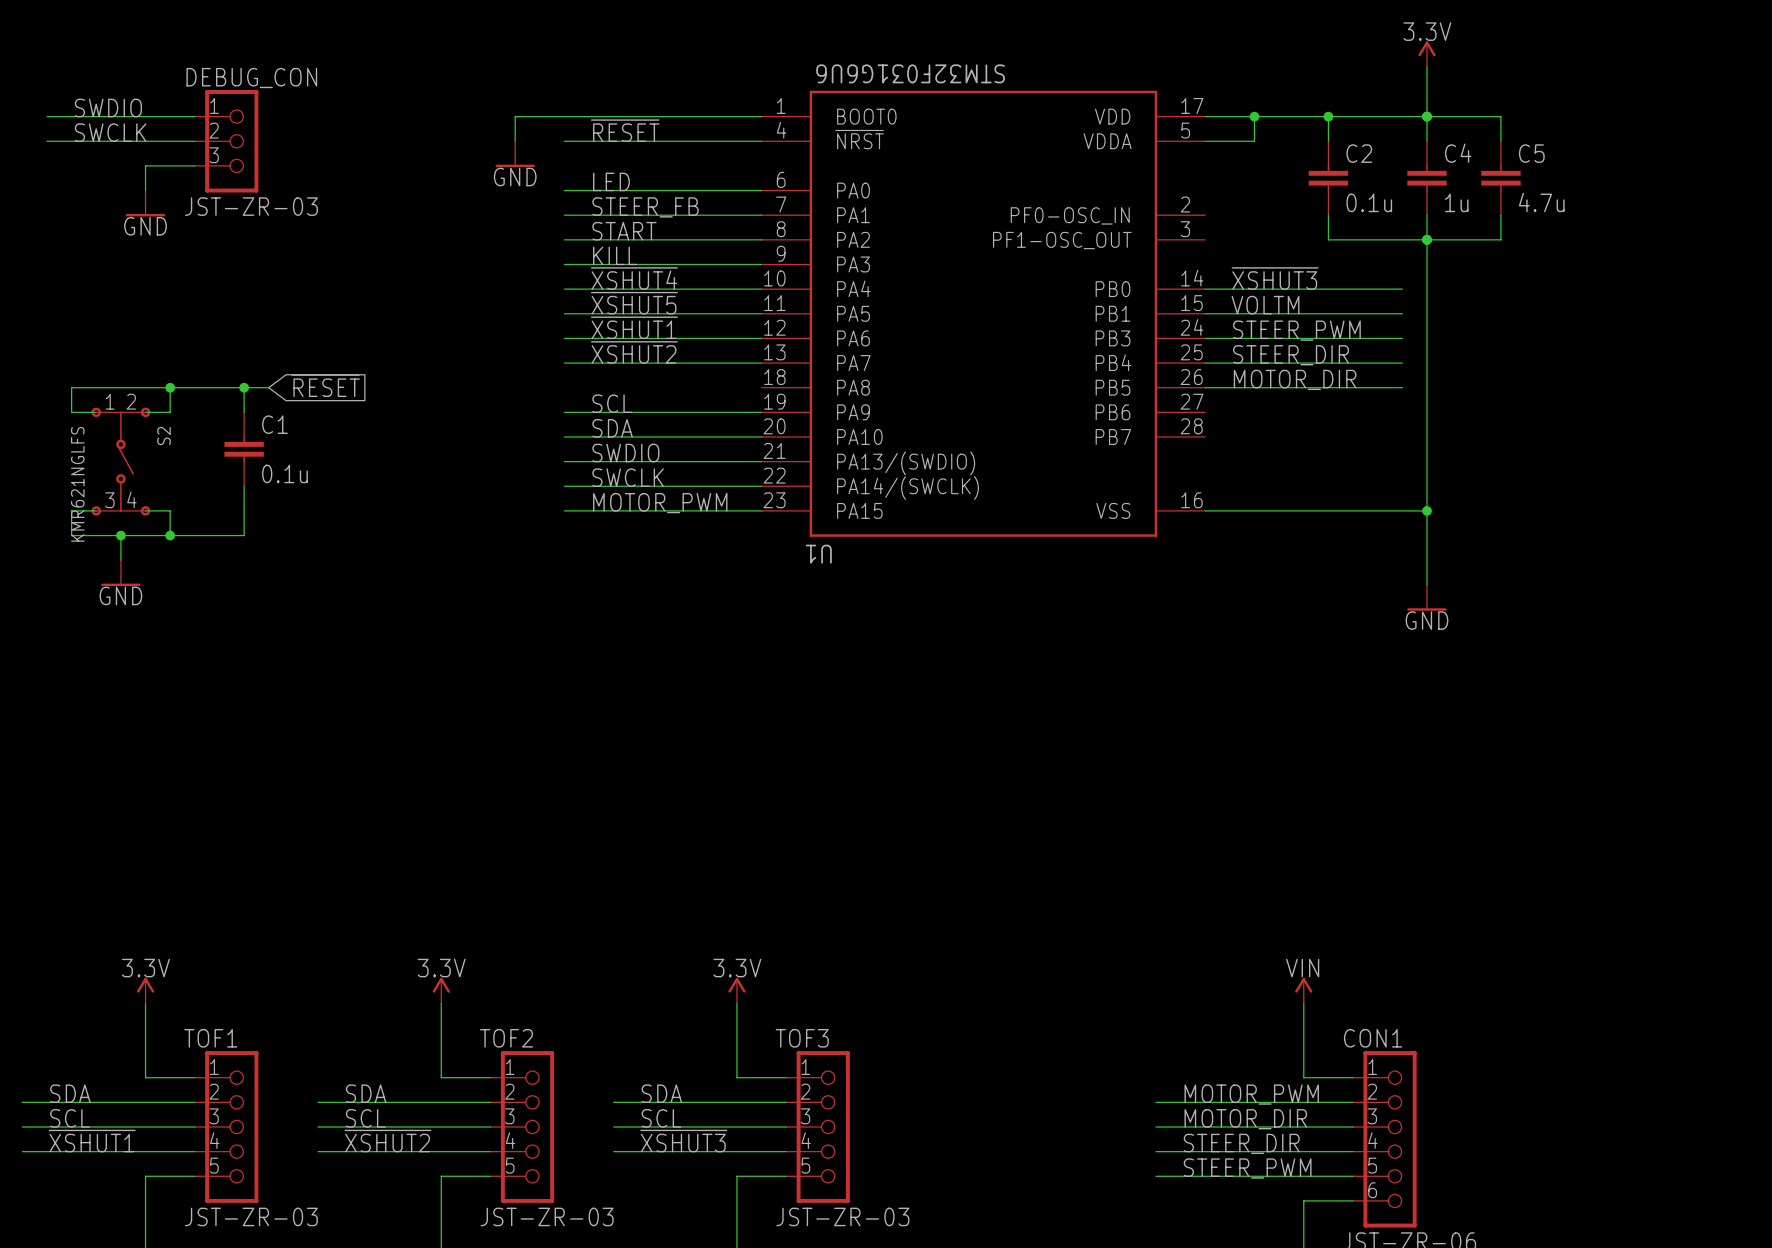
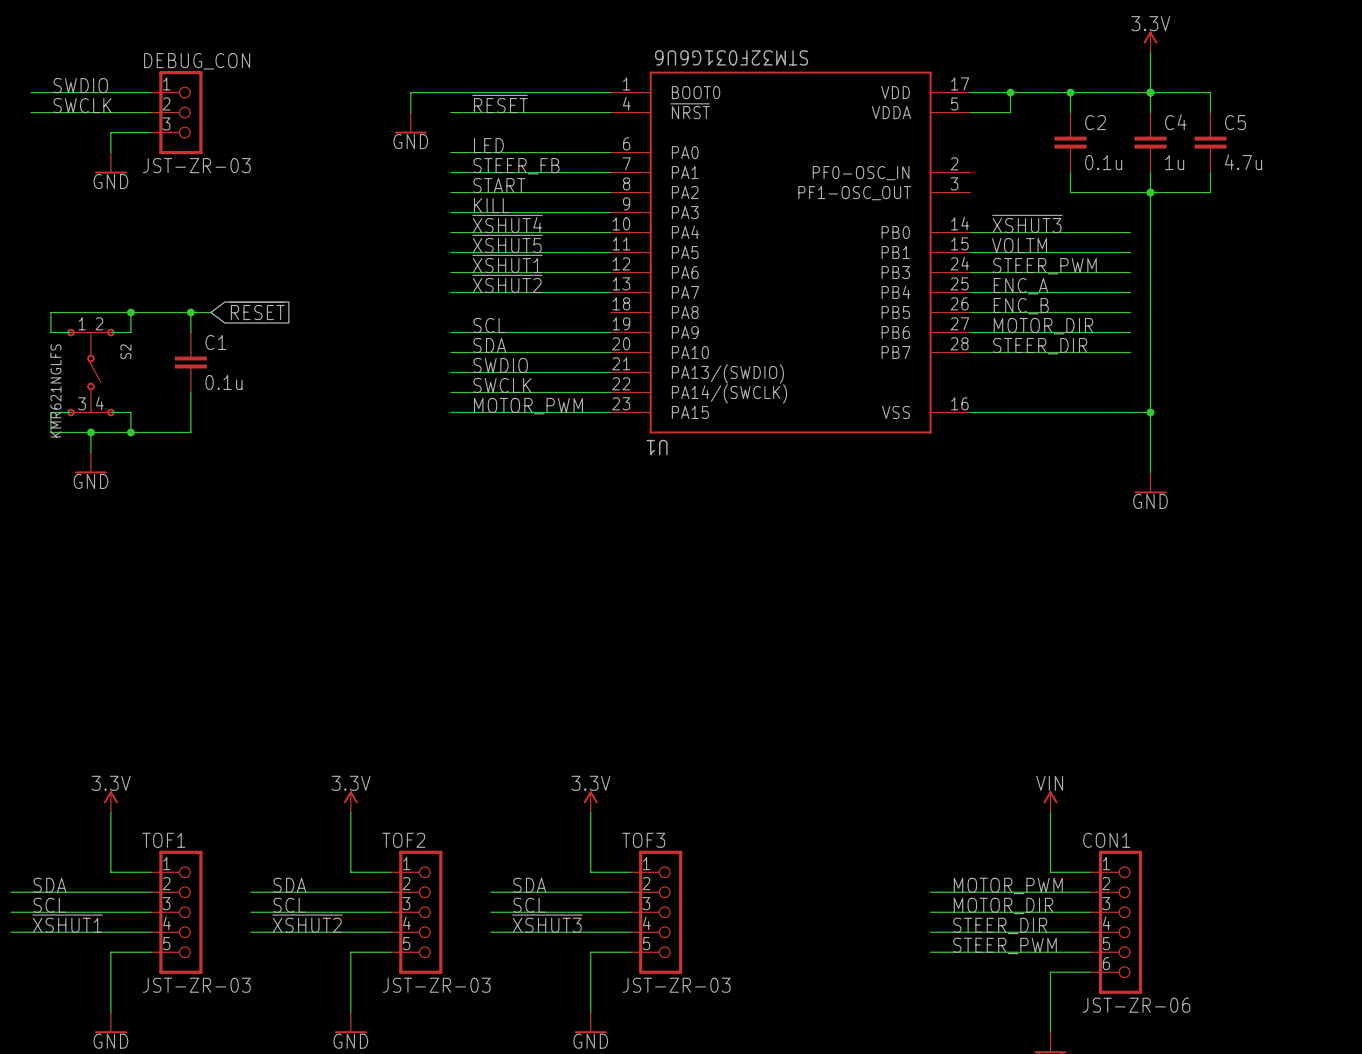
label: STEER_DIR (1291, 355) -> ENC_A (1020, 286)
label: MOTOR_DIR (1295, 379) -> ENC_B (1021, 306)
label: none -> MOTOR_DIR (1043, 326)
wire: none -> (970, 332) (1130, 332)
label: none -> STEER_DIR (1040, 346)
wire: none -> (970, 352) (1130, 352)

